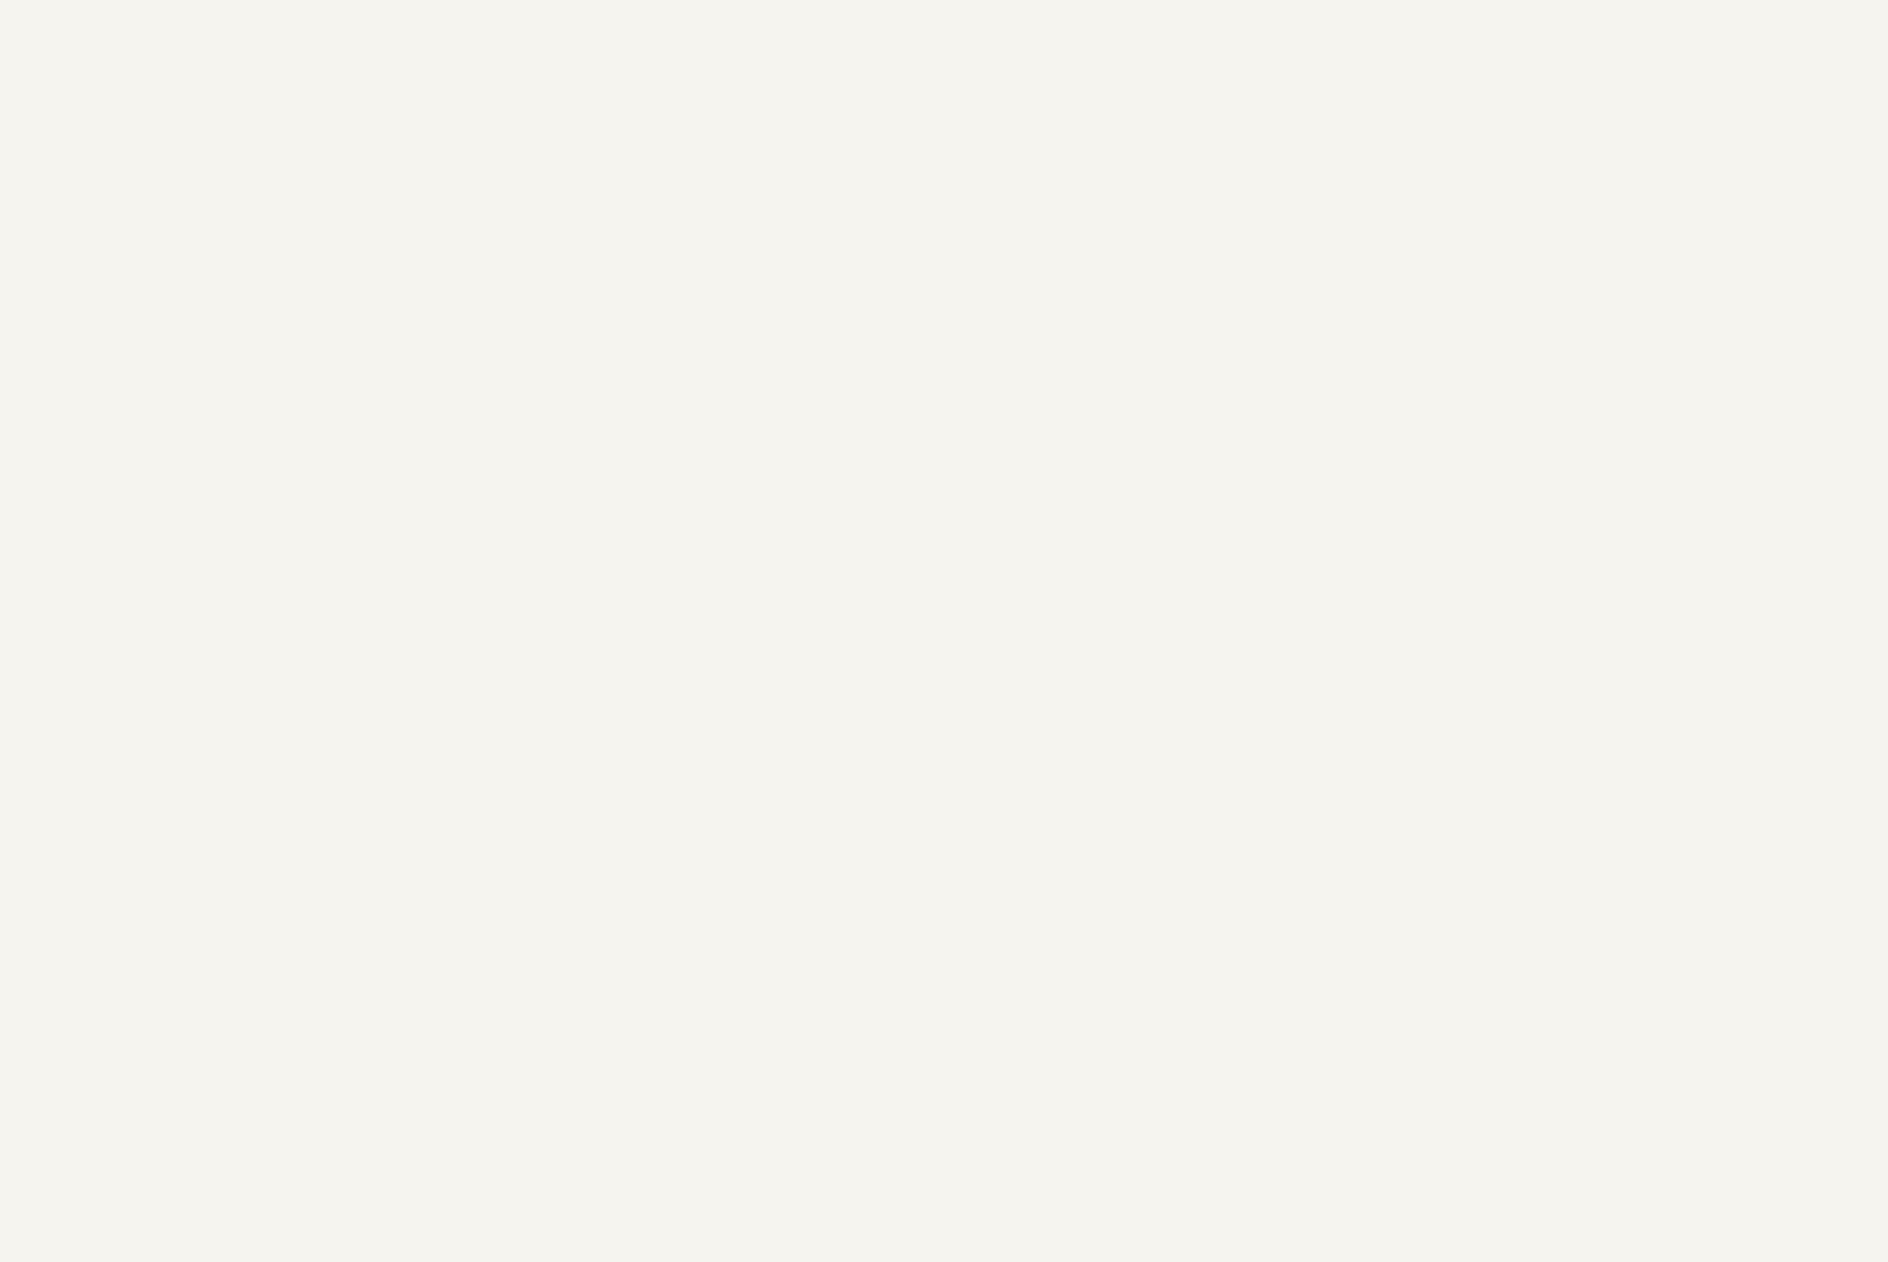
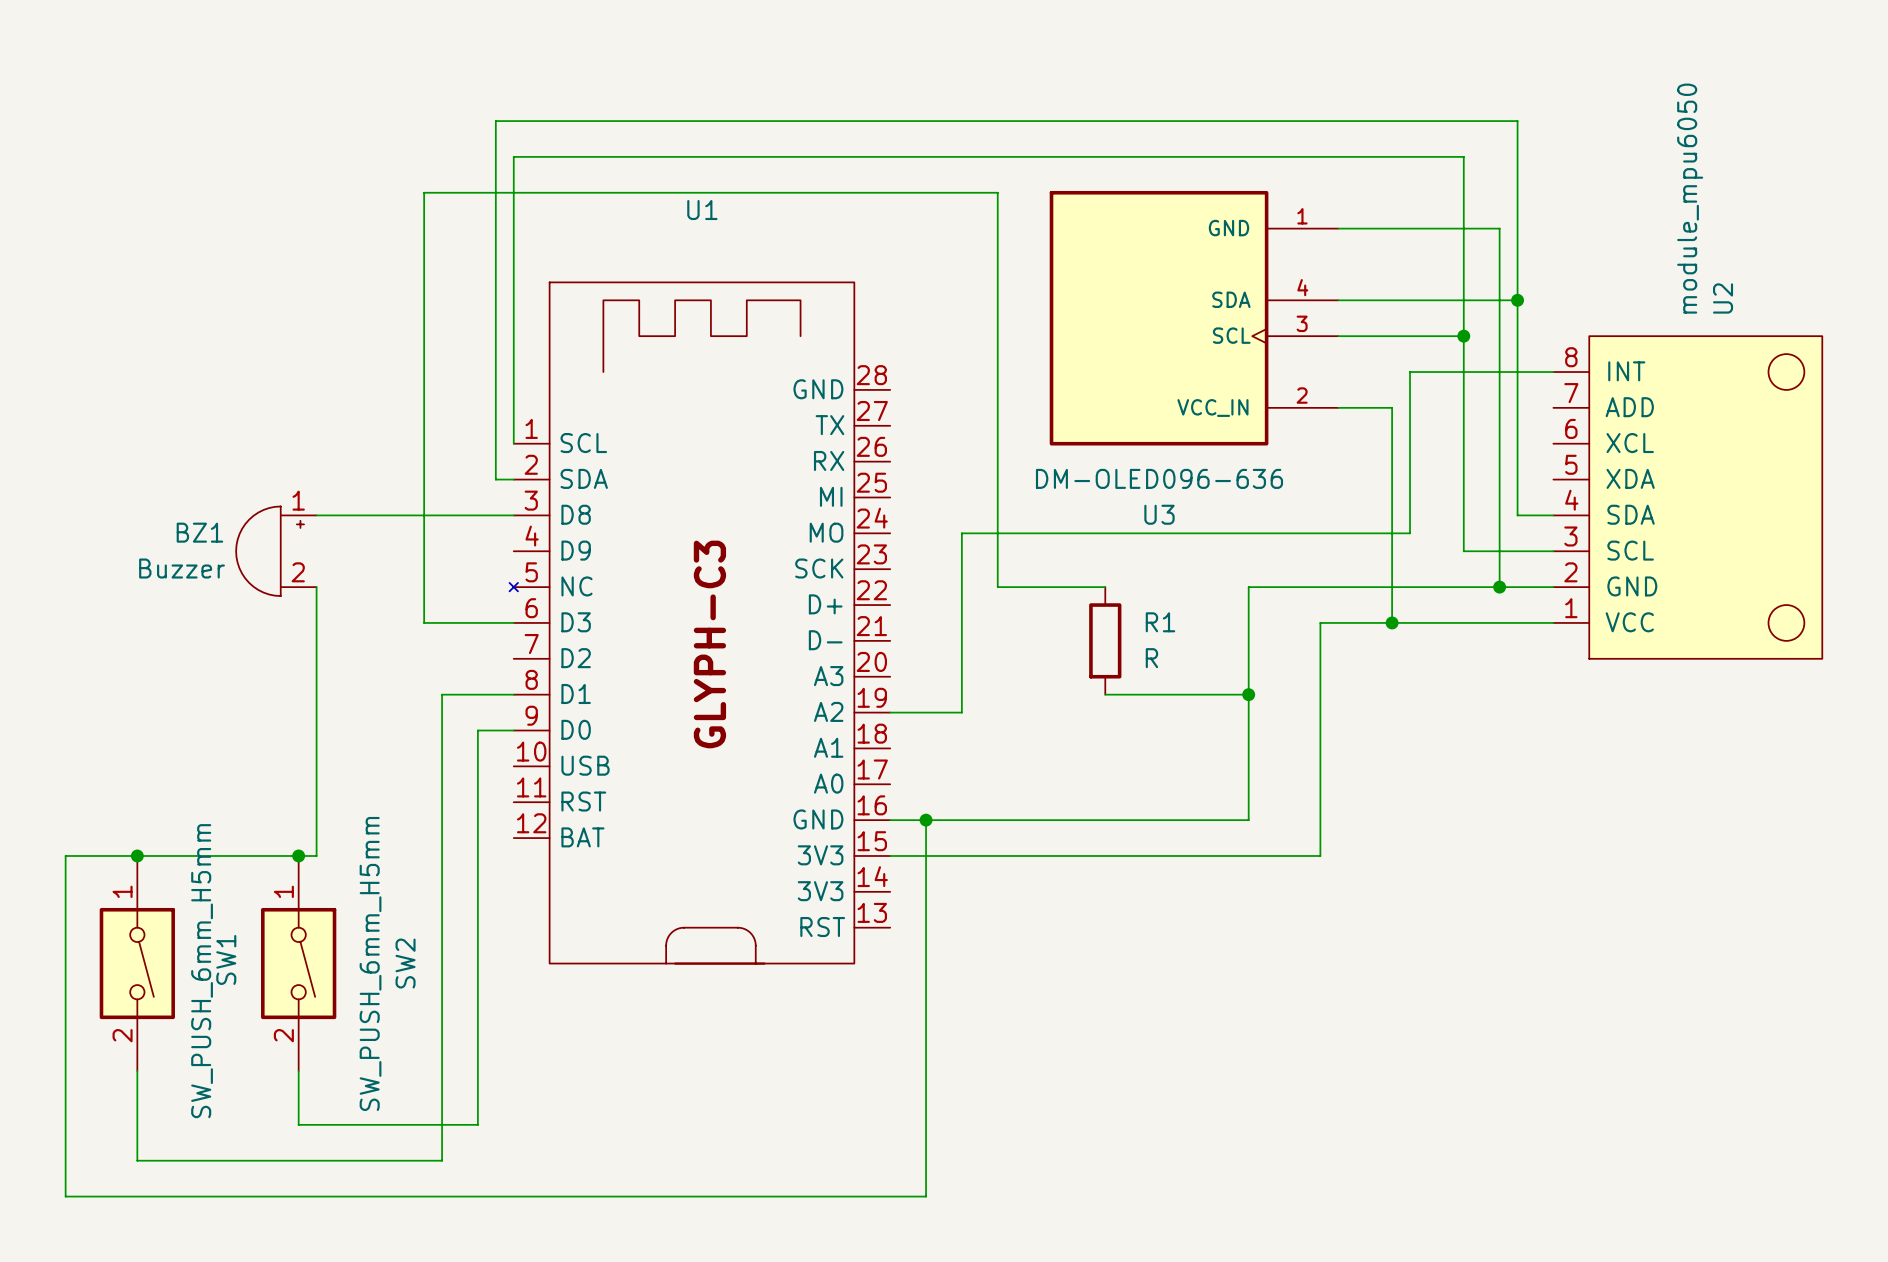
wire: none -> (1338, 228) (1499, 228) (1499, 587)
wire: none -> (1338, 300) (1517, 300)
junction: none -> (1517, 300)
U3: none -> DM-OLED096-636 (1194, 318)
wire: none -> (1338, 336) (1463, 336)
junction: none -> (1463, 336)
wire: none -> (1553, 372) (1410, 372) (1410, 533) (961, 533) (961, 712) (890, 712)
wire: none -> (1338, 407) (1392, 407) (1392, 622)
wire: none -> (513, 443) (513, 156) (1463, 156) (1463, 551) (1553, 551)
wire: none -> (513, 479) (495, 479) (495, 121) (1517, 121) (1517, 515) (1553, 515)
U2: none -> module_mpu6050 (1687, 497)
wire: none -> (316, 515) (513, 515)
BZ1: none -> Buzzer (276, 551)
wire: none -> (316, 587) (316, 855) (65, 855) (65, 1196) (926, 1196) (926, 820)
wire: none -> (1105, 587) (997, 587) (997, 192) (424, 192) (424, 622) (513, 622)
junction: none -> (1499, 587)
wire: none -> (1553, 587) (1248, 587) (1248, 820) (890, 820)
U1: none -> (699, 622)
junction: none -> (1392, 622)
wire: none -> (1553, 622) (1320, 622) (1320, 855) (890, 855)
R1: none -> R (1105, 640)
wire: none -> (513, 694) (442, 694) (442, 1160) (137, 1160) (137, 1071)
wire: none -> (1105, 694) (1248, 694)
junction: none -> (1248, 694)
wire: none -> (513, 730) (477, 730) (477, 1124) (298, 1124) (298, 1071)
junction: none -> (926, 820)
junction: none -> (137, 855)
junction: none -> (298, 855)
SW1: none -> SW_PUSH_6mm_H5mm (137, 963)
SW2: none -> SW_PUSH_6mm_H5mm (298, 963)

